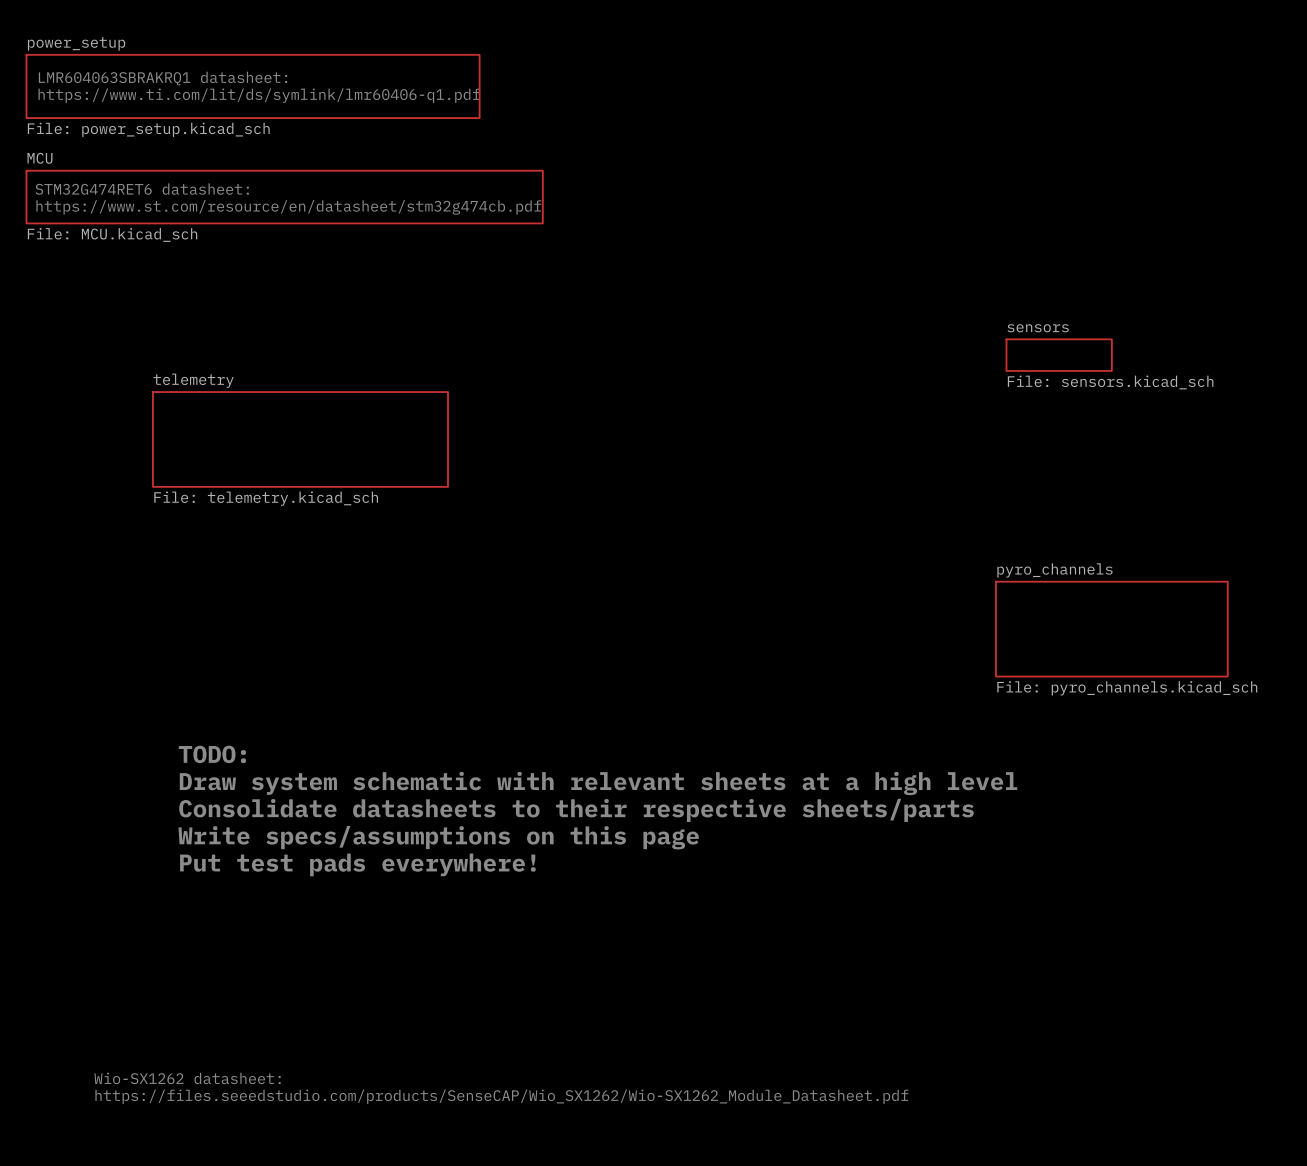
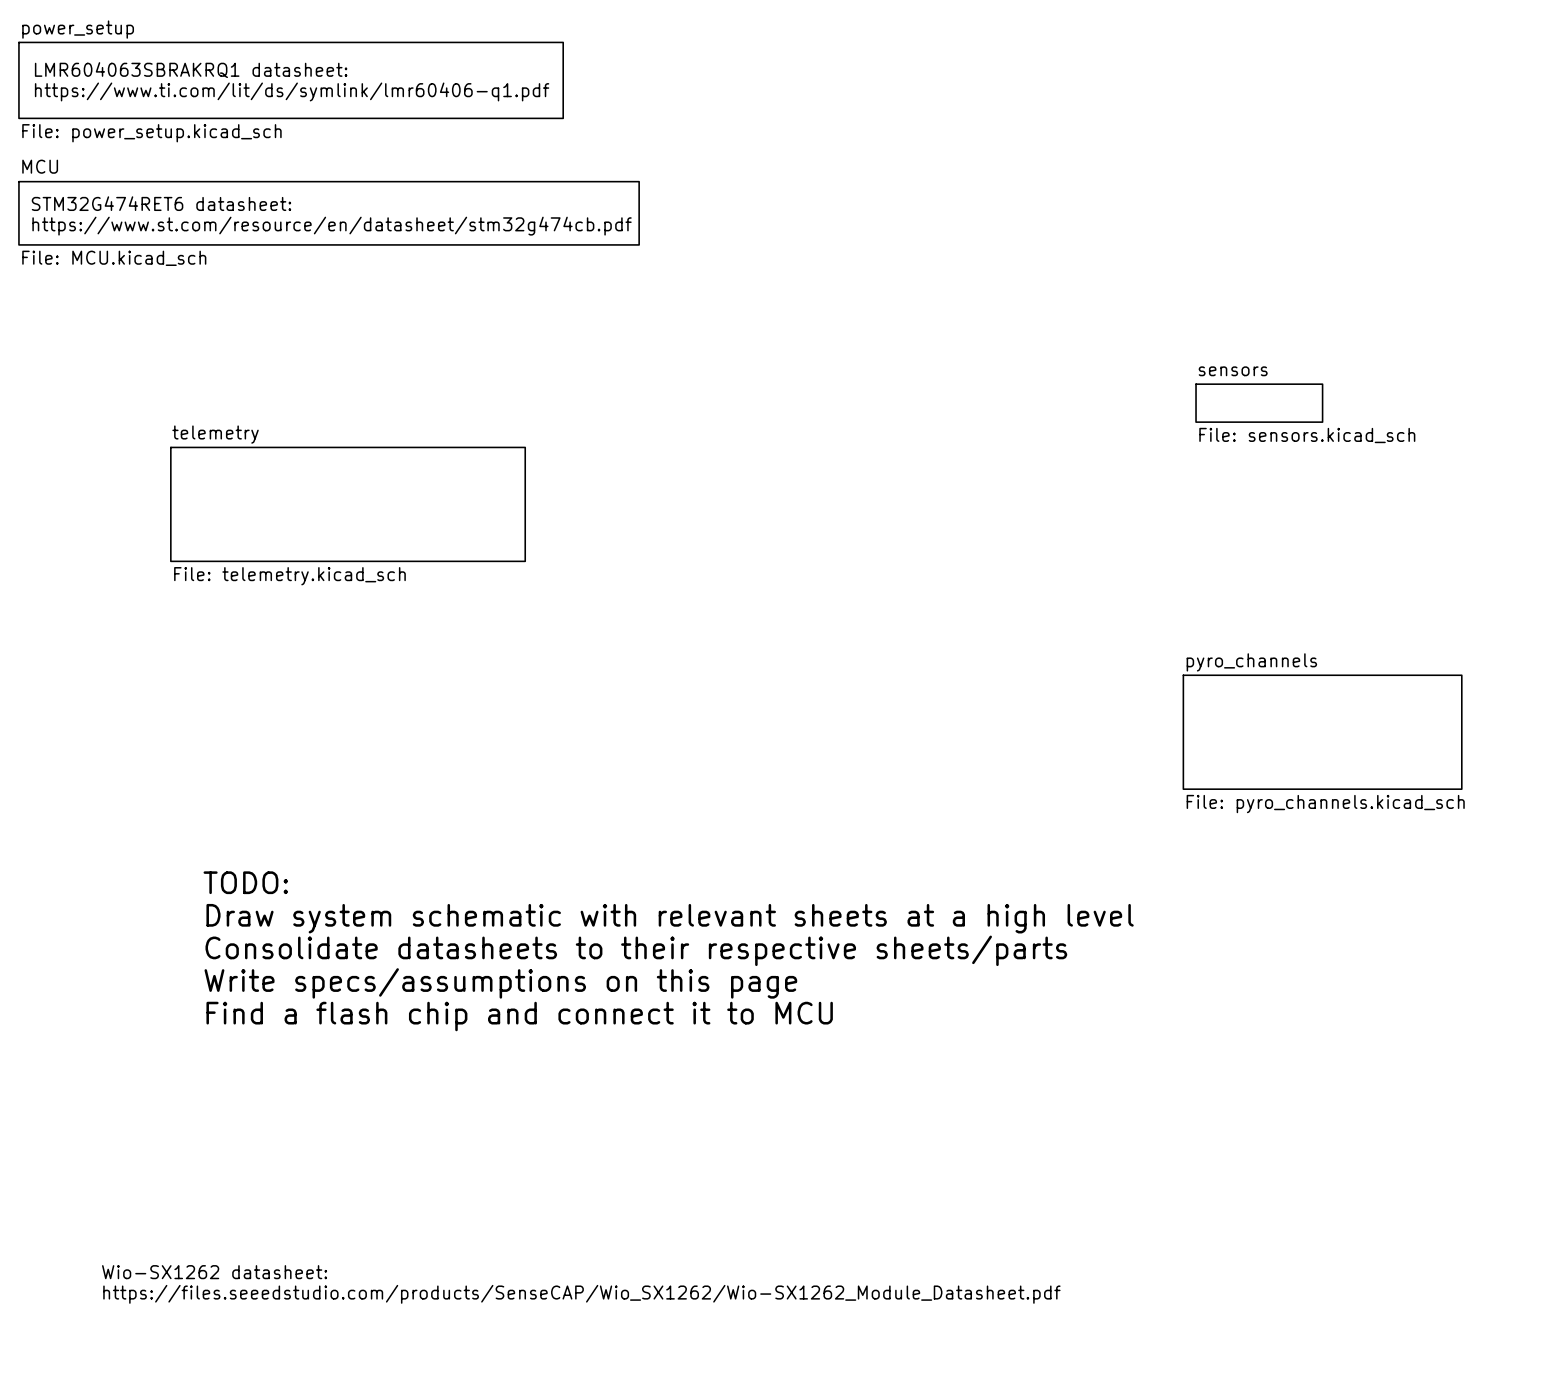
text: Put test pads everywhere! (357, 864) -> Find a flash chip and connect it to MCU (519, 1016)

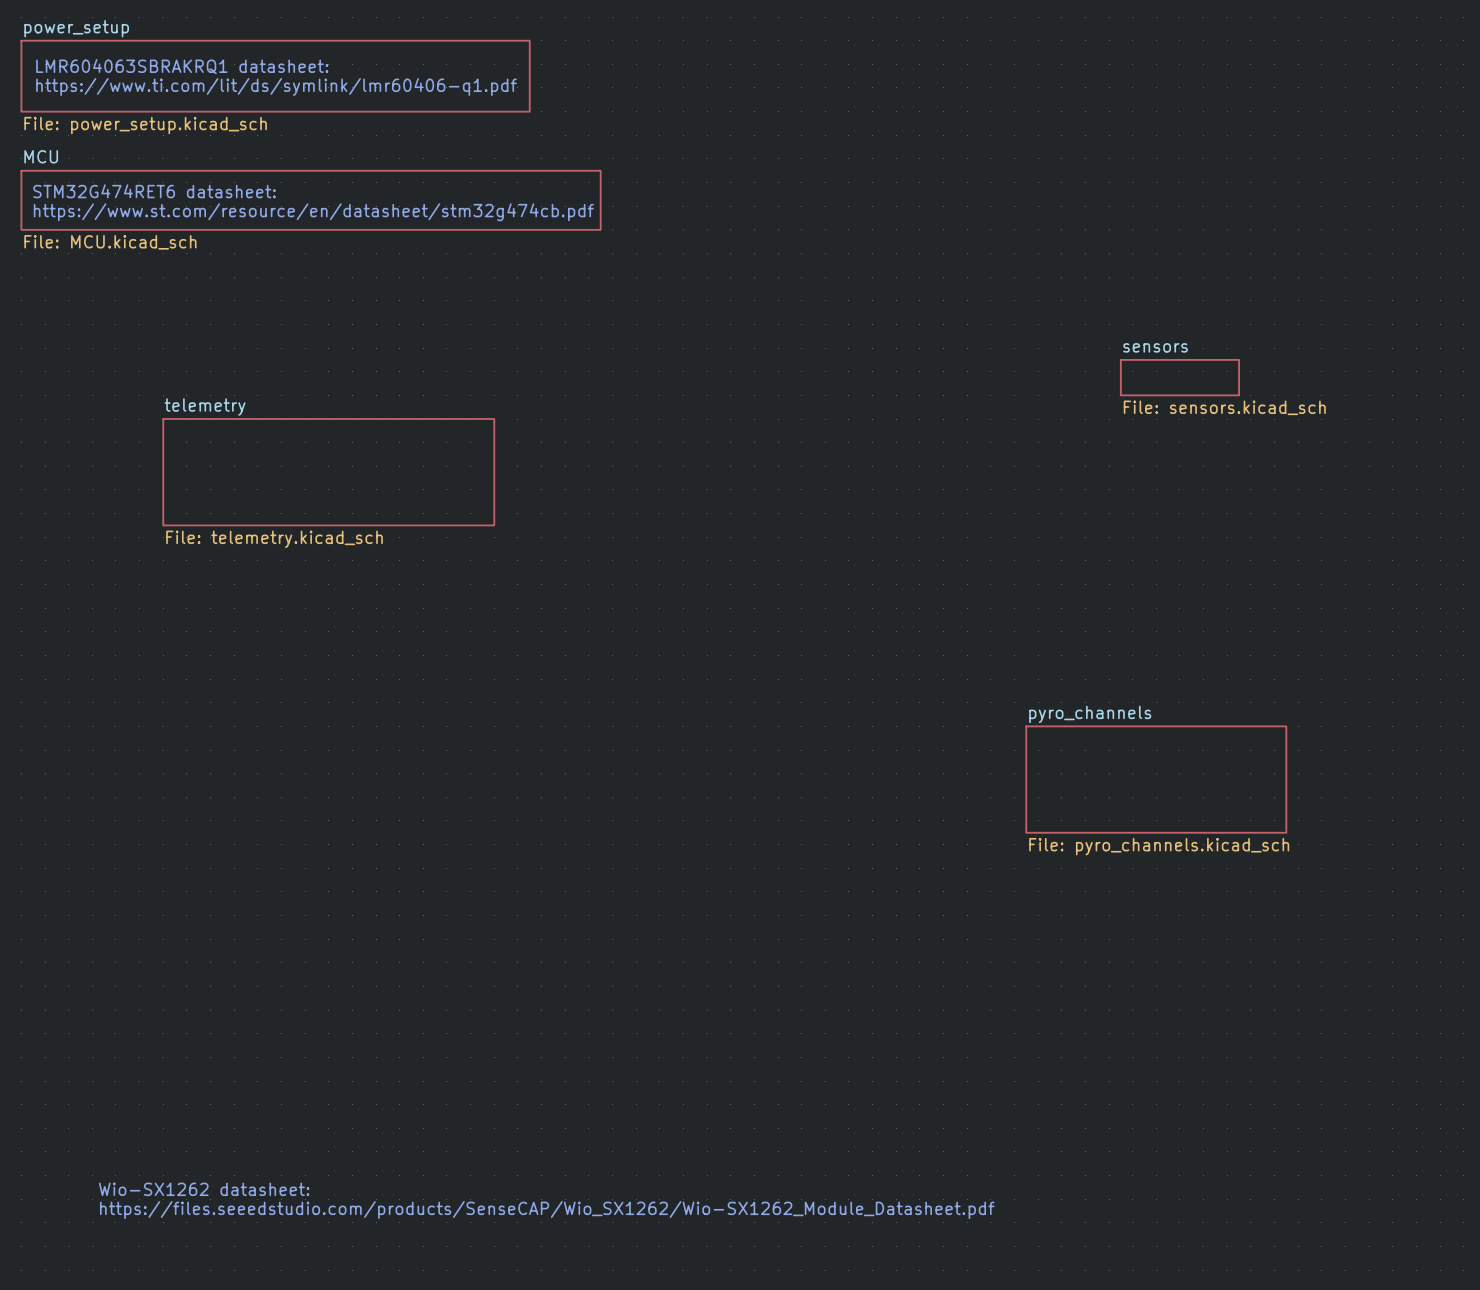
sheet pyro_channels position: (1322, 732) -> (1156, 779)
text: TODO: (245, 882) -> none
text: Draw system schematic with relevant sheets at a high level (670, 918) -> none
text: Consolidate datasheets to their respective sheets/parts (636, 950) -> none
text: Write specs/assumptions on this page (500, 983) -> none
text: Find a flash chip and connect it to MCU (519, 1016) -> none

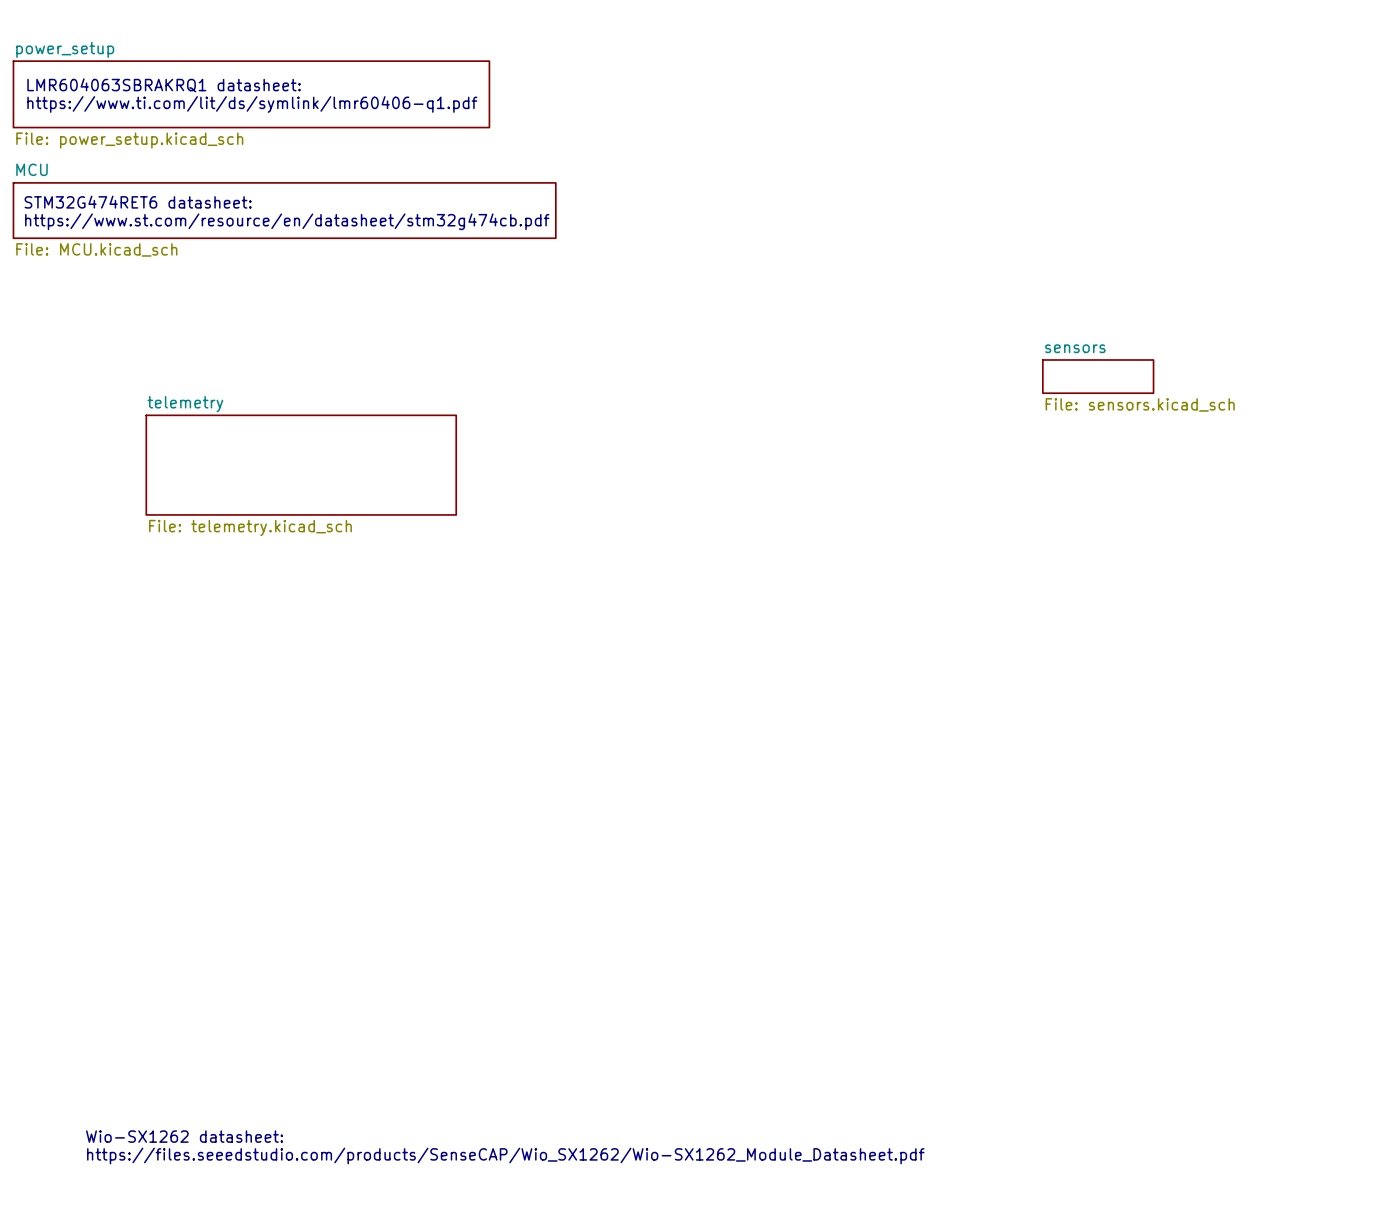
sheet pyro_channels: File: pyro_channels.kicad_sch (1156, 779) -> none

